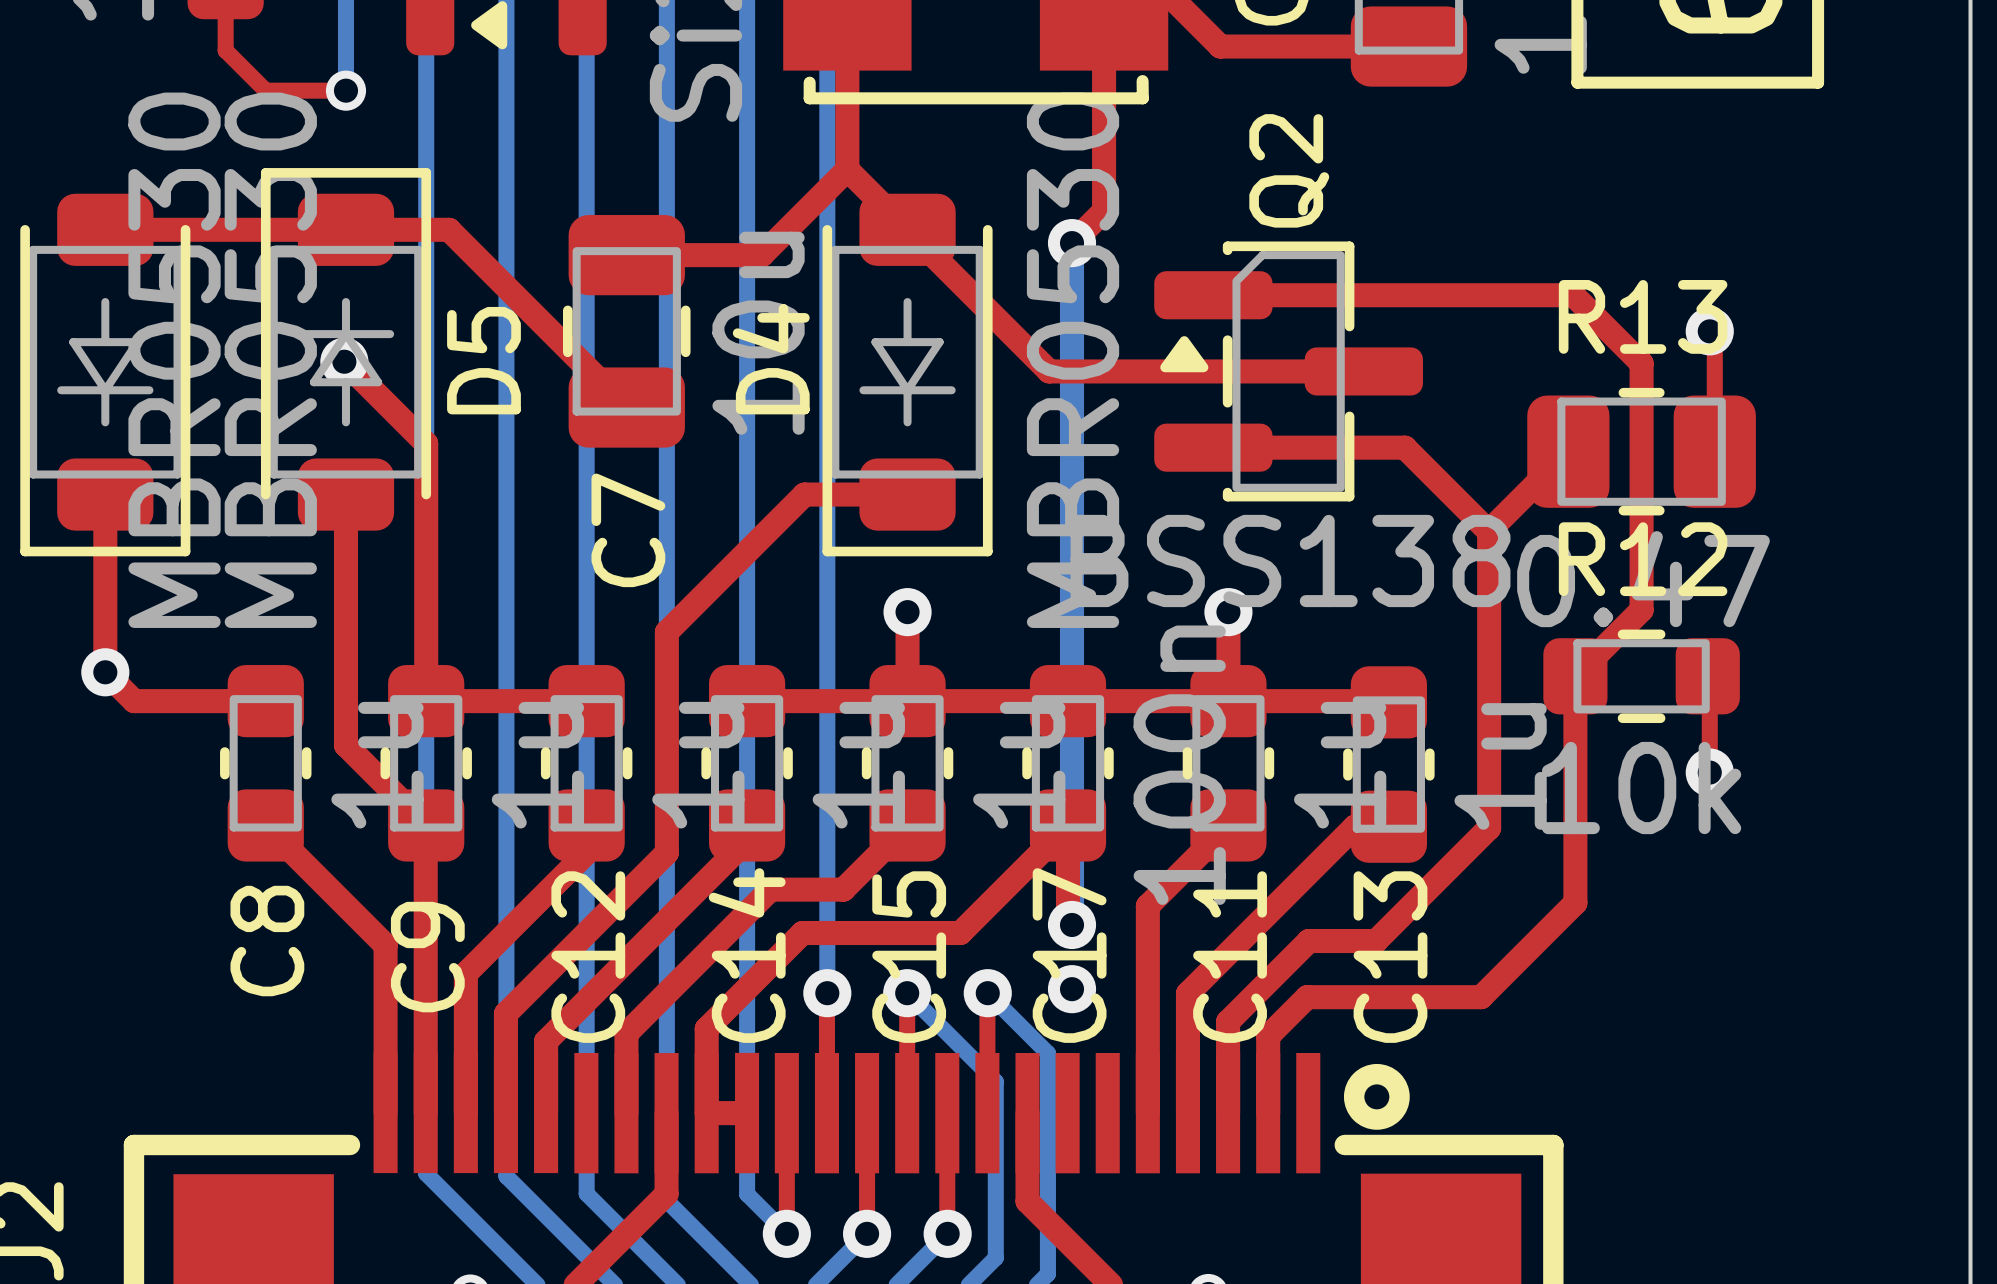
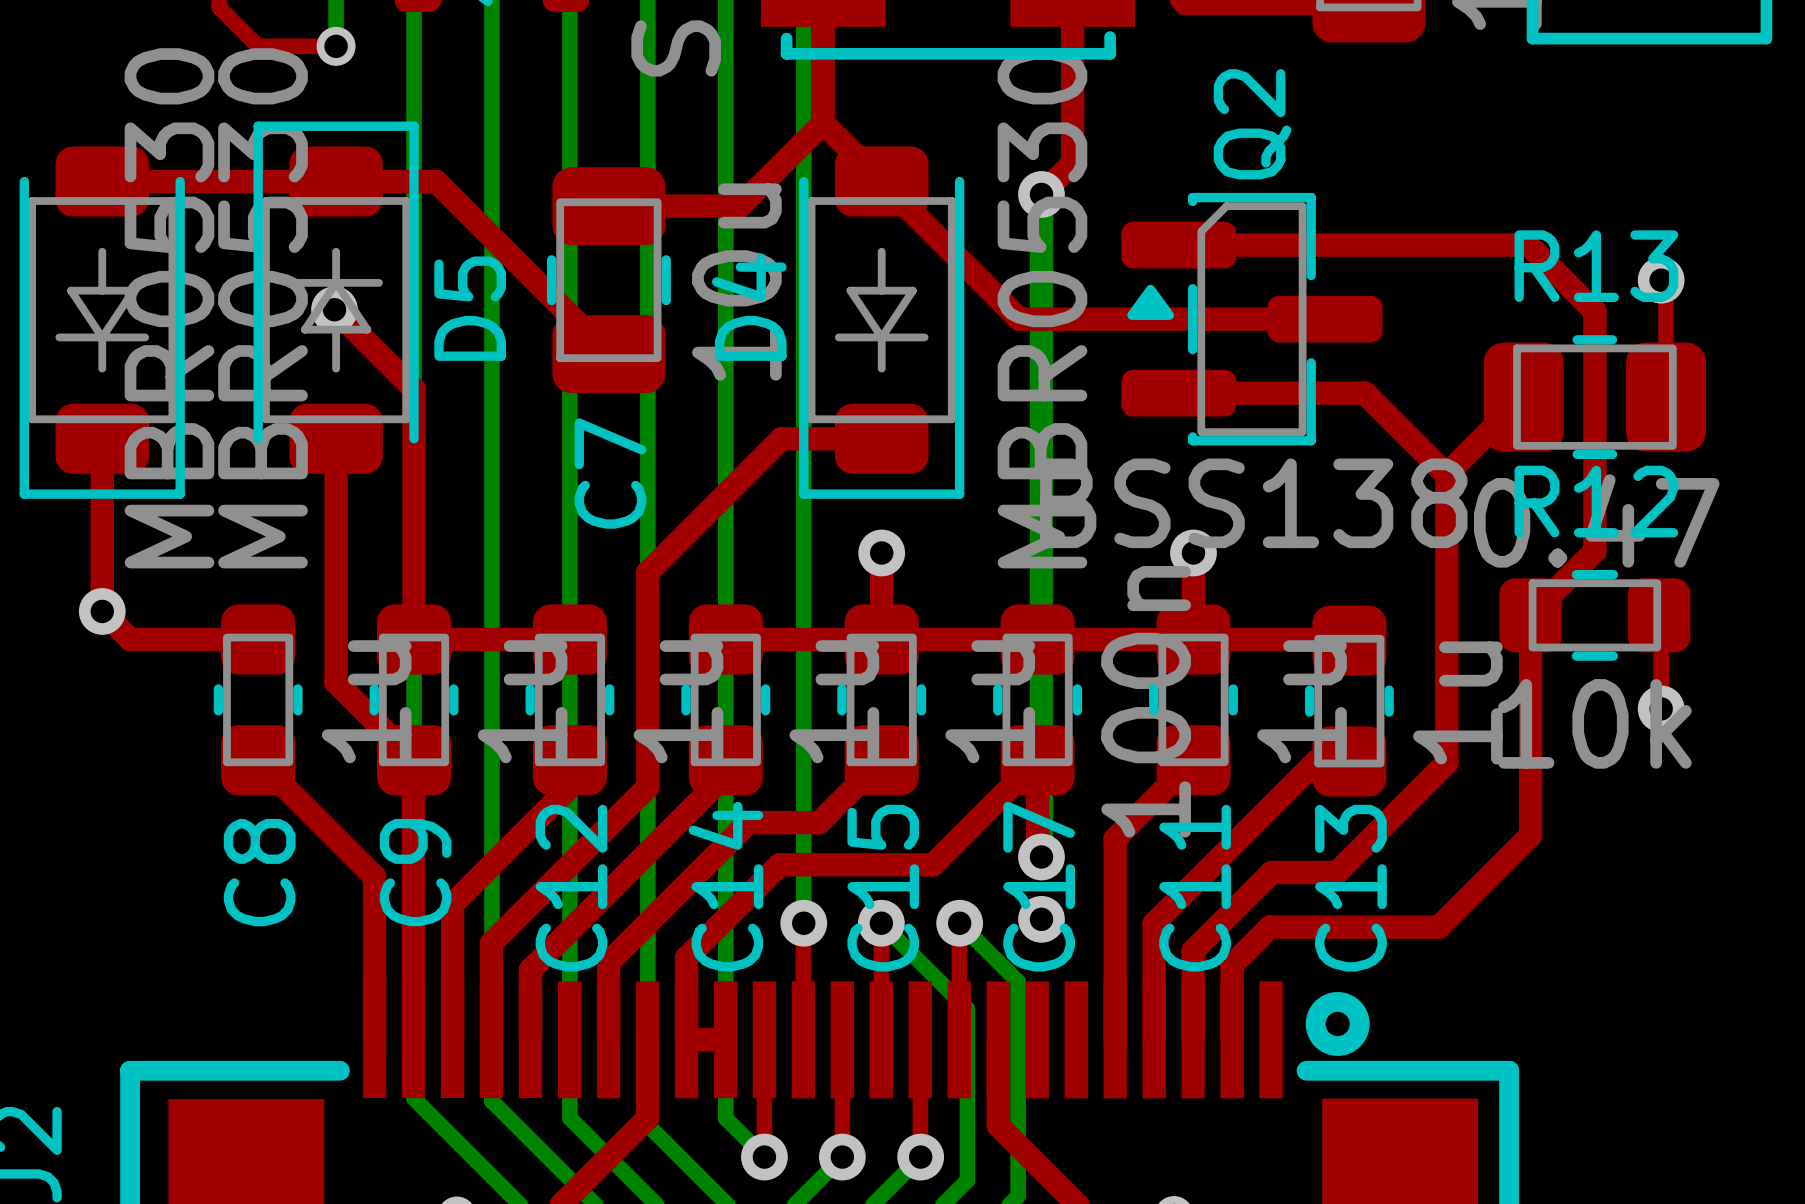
C9 name position: C9 (427, 957) -> C9 (415, 872)

